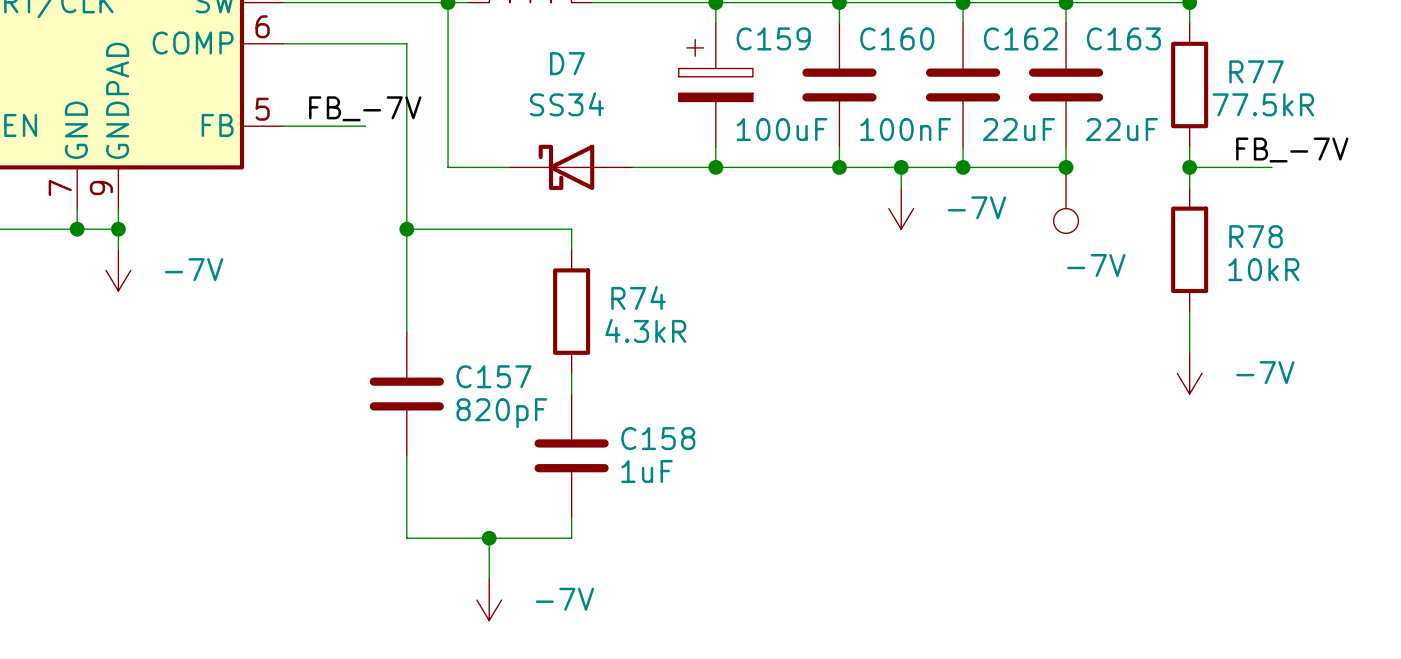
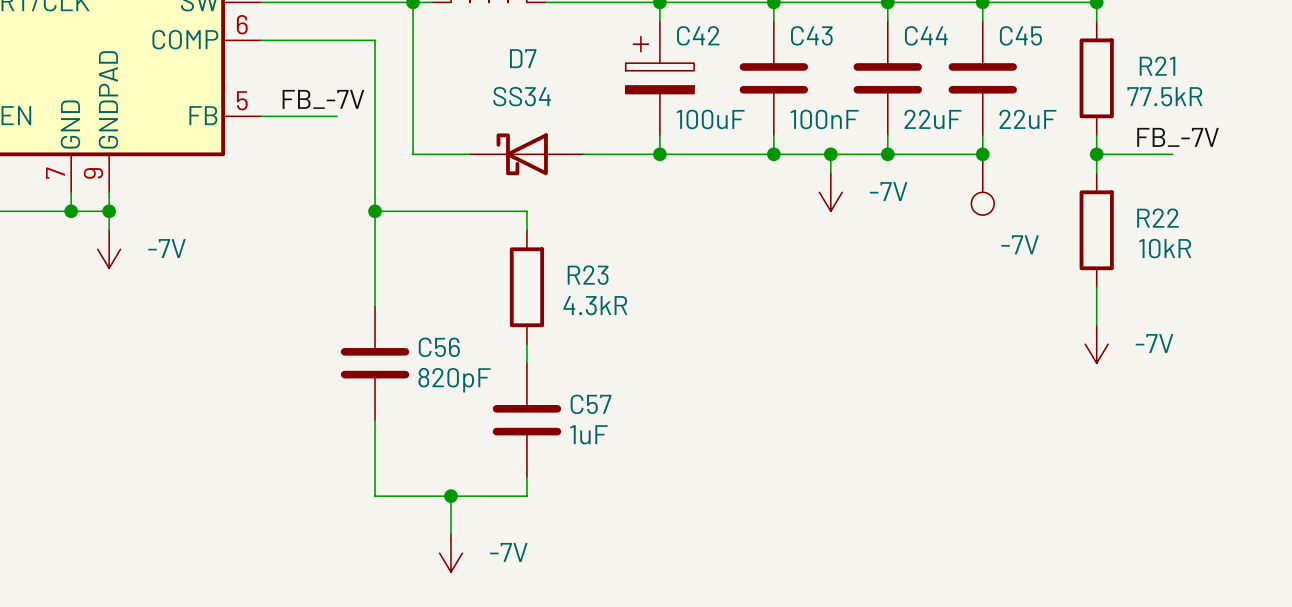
C159 name: C159 (773, 38) -> C42 (698, 35)
C160 name: C160 (897, 38) -> C43 (811, 35)
C162 name: C162 (1020, 38) -> C44 (926, 35)
C163 name: C163 (1123, 38) -> C45 (1020, 35)
R77 name: R77 (1256, 71) -> R21 (1157, 66)
R78 name: R78 (1256, 236) -> R22 (1157, 218)
R74 name: R74 (638, 297) -> R23 (588, 275)
C157 name: C157 (493, 376) -> C56 (439, 347)
C158 name: C158 (658, 438) -> C57 (591, 404)

